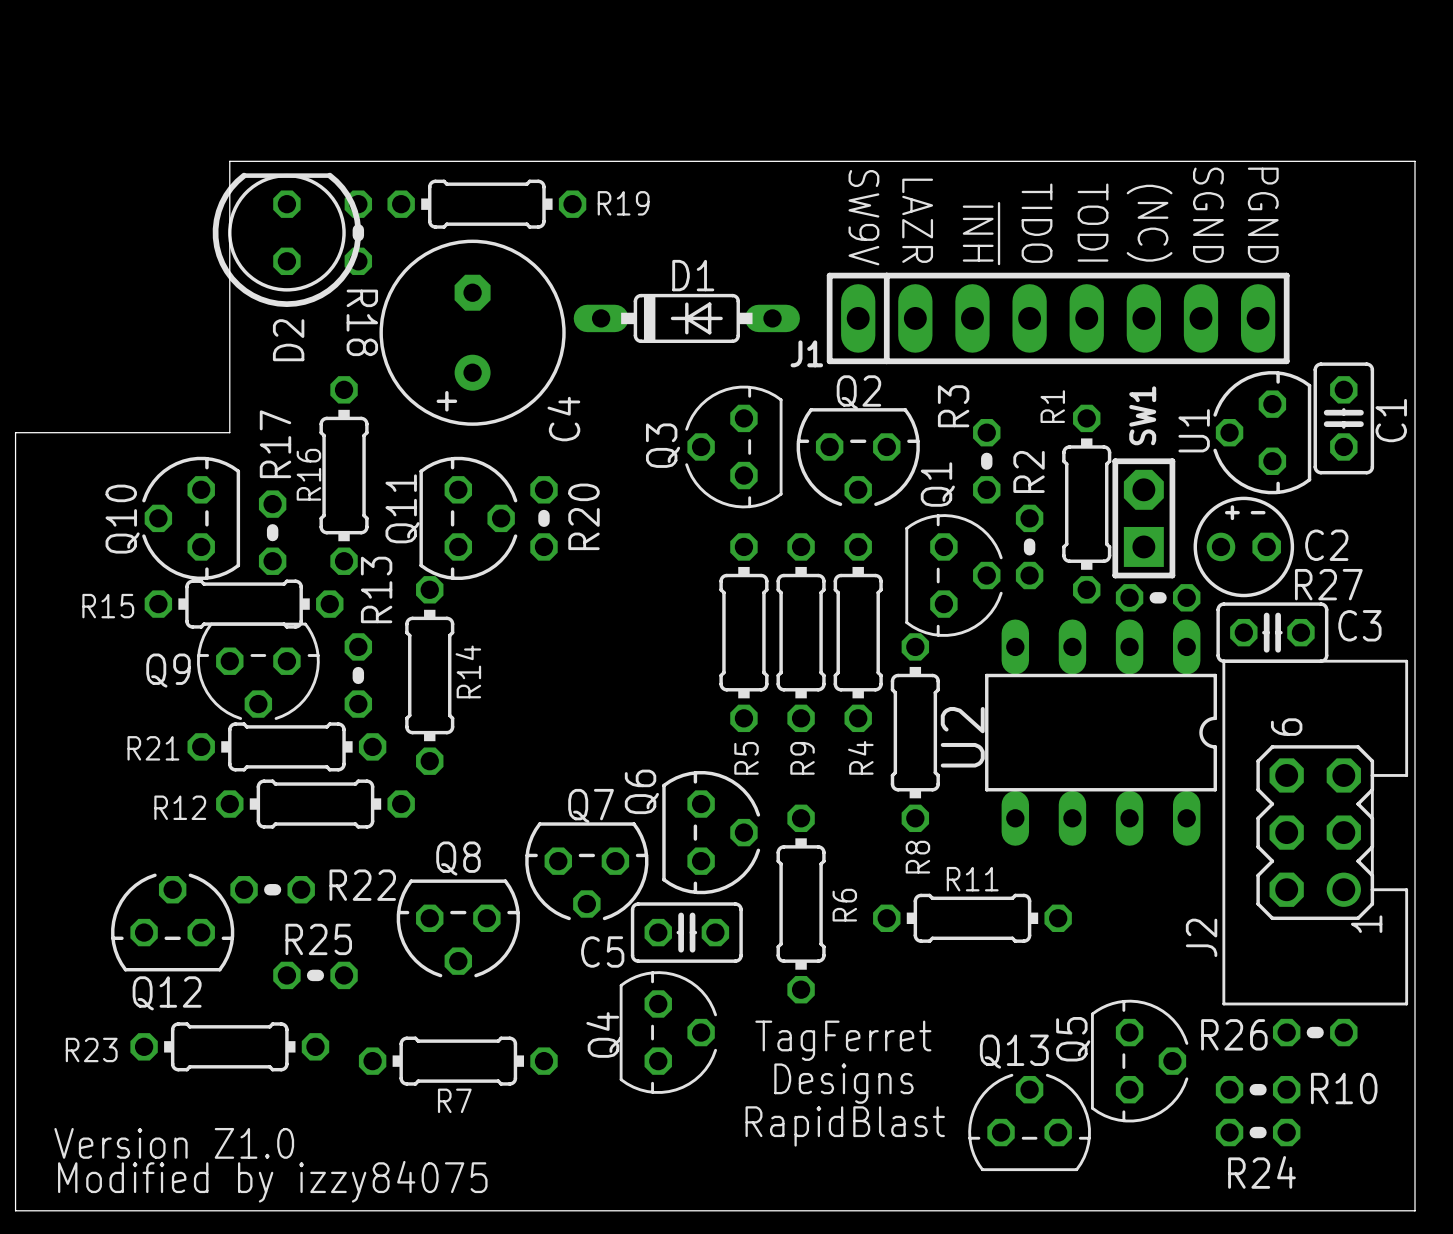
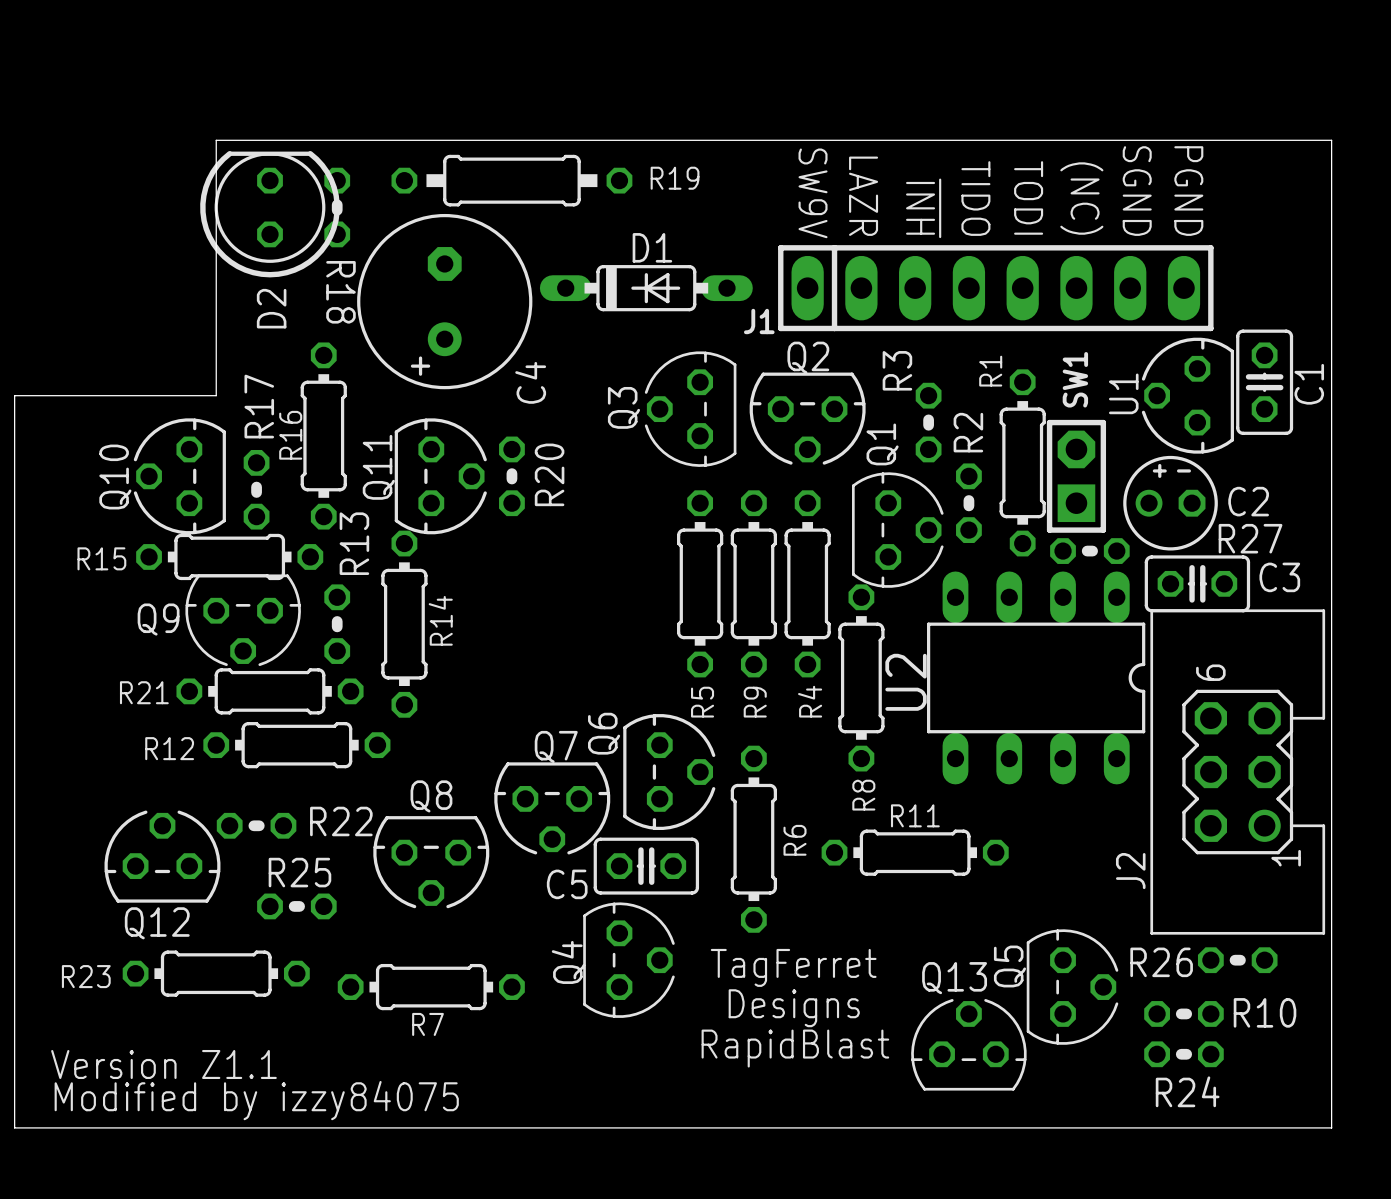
R19 footprint: [387, 179, 587, 229] -> [391, 154, 633, 207]
text: Version Z1.0 (174, 1143) -> Version Z1.1 (163, 1064)

